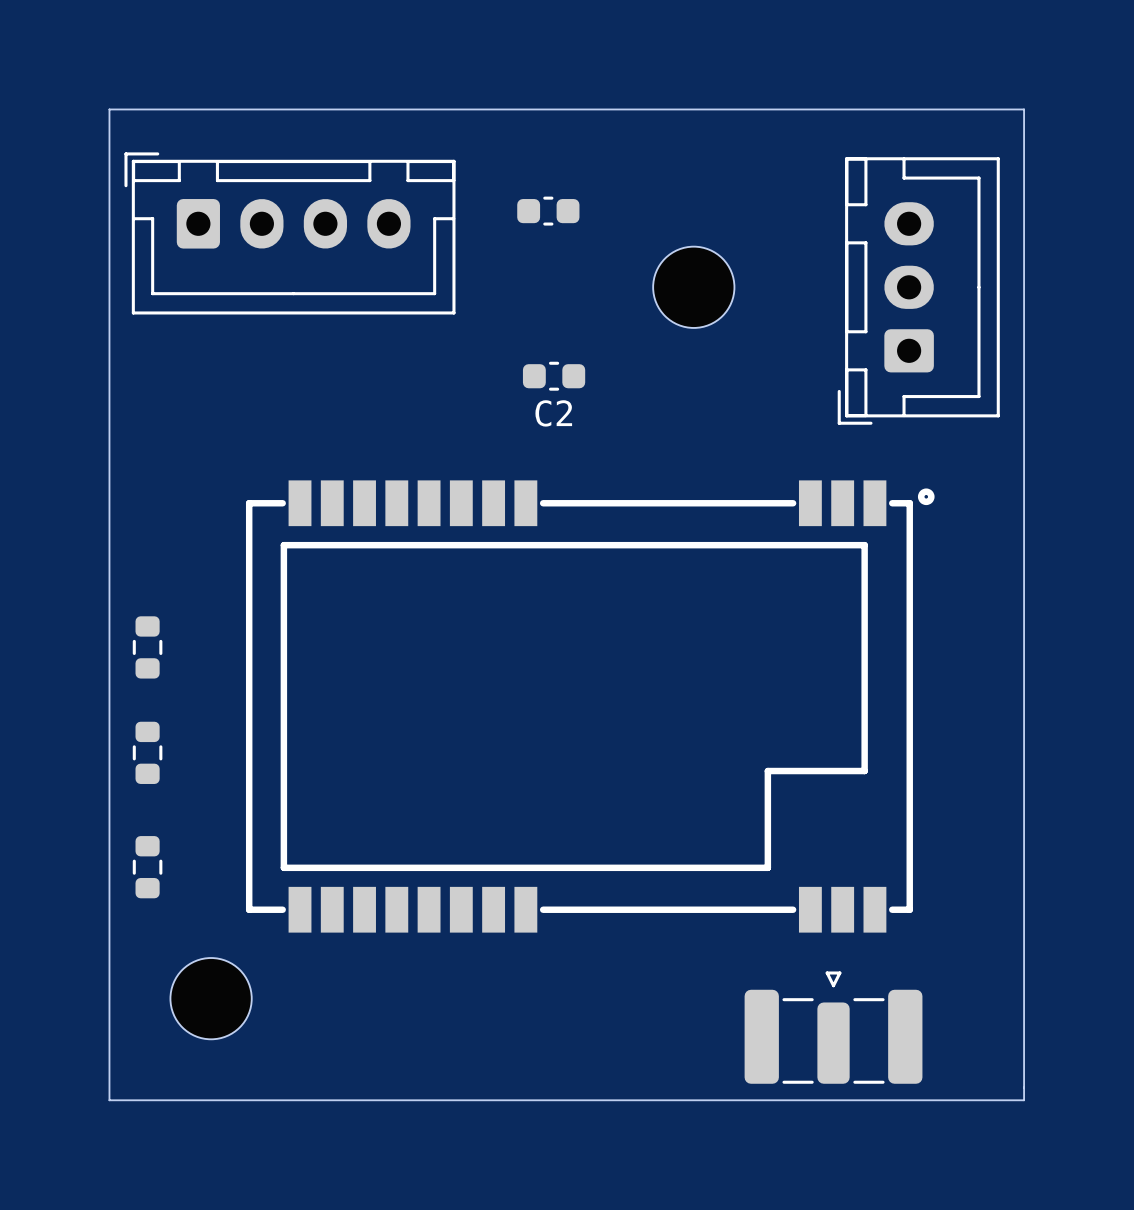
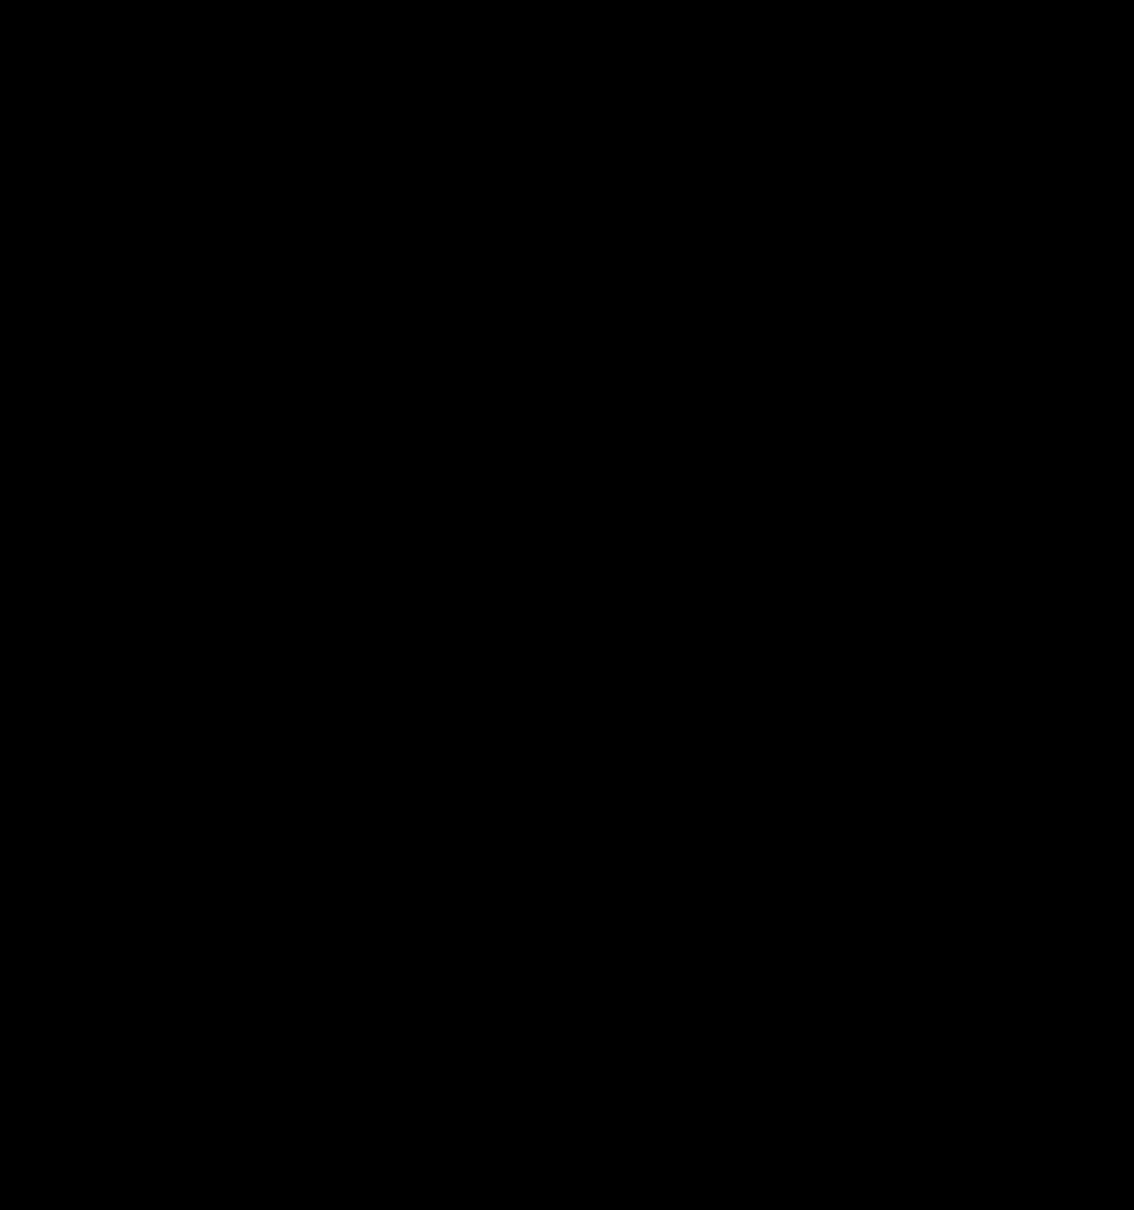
board edge: (109, 109) (1024, 109) (1024, 1100) (109, 1100) (109, 109) -> none
part: (548, 211) -> none
part: (289, 233) -> none
part: (693, 287) -> none
part: (918, 290) -> none
C2: (554, 376) -> none
part: (147, 647) -> none
part: (590, 706) -> none
part: (147, 752) -> none
part: (147, 867) -> none
part: (211, 998) -> none
part: (833, 1027) -> none

